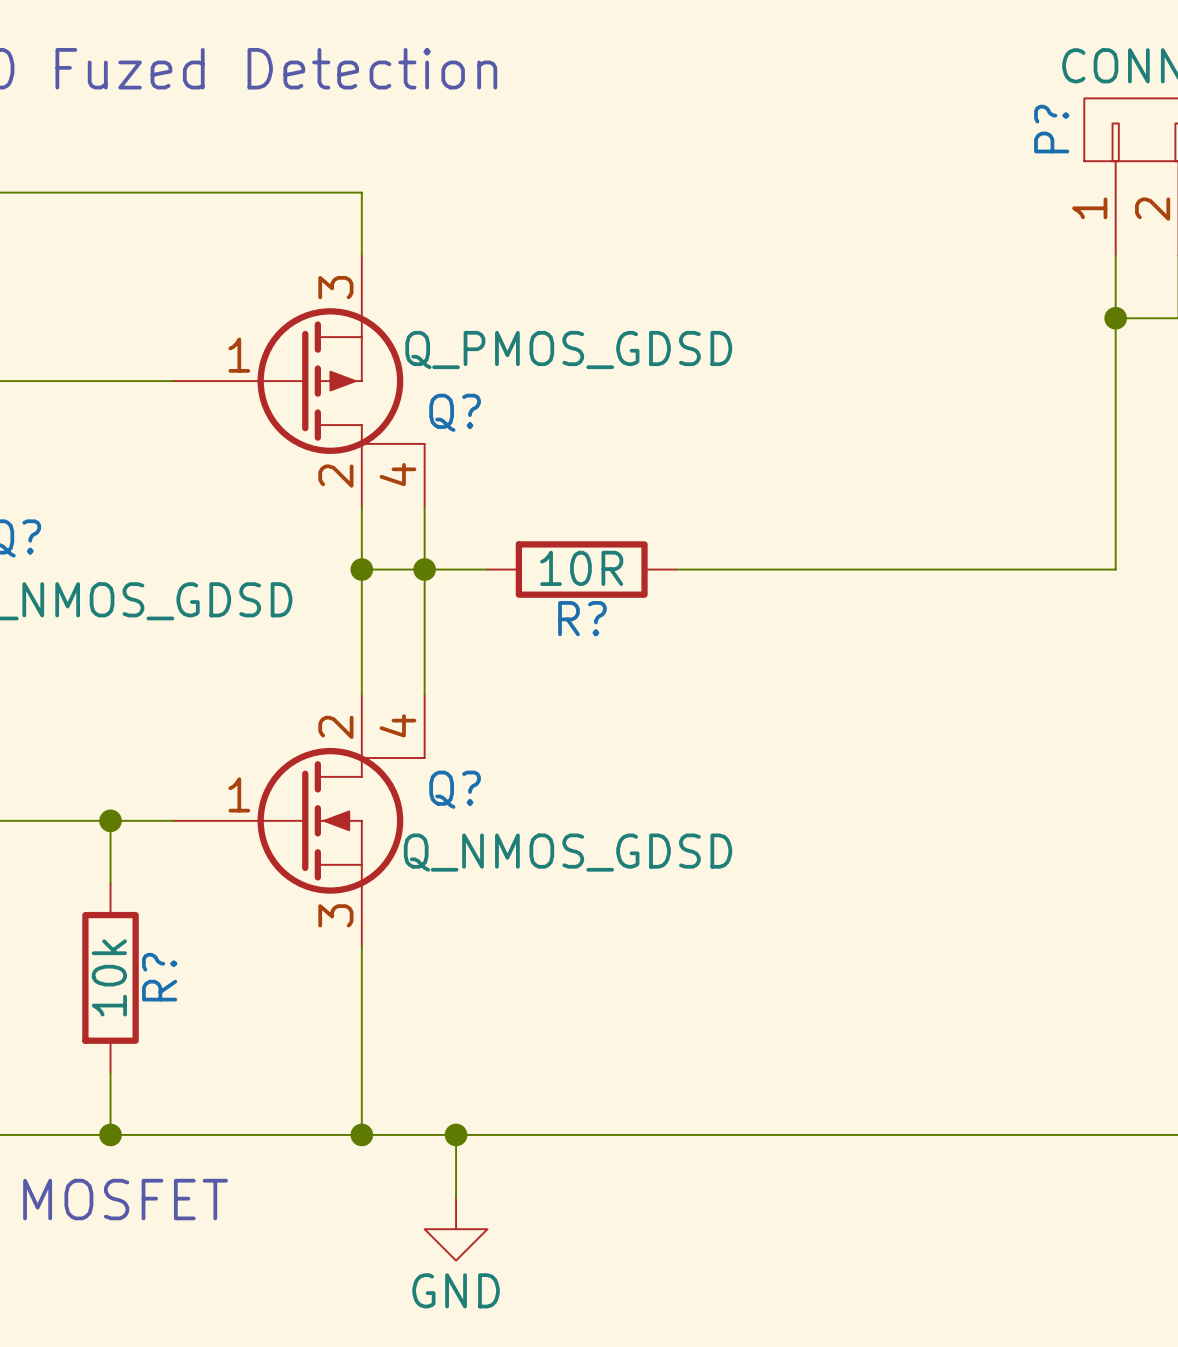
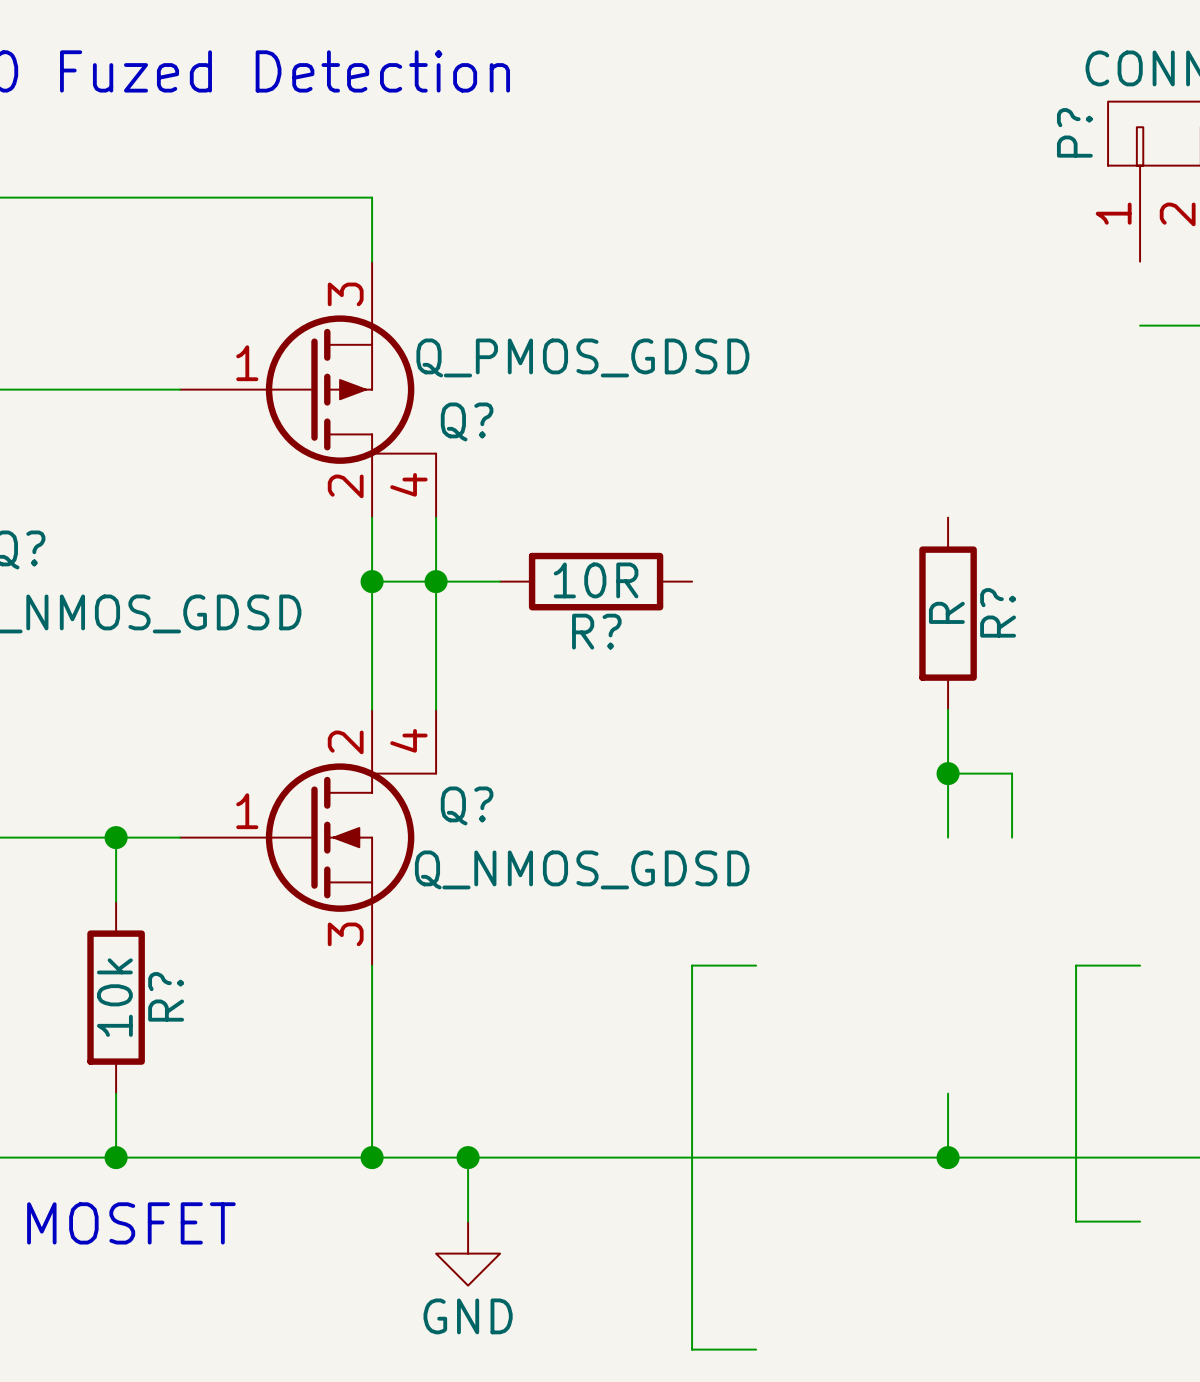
wire: (1115, 255) (1115, 569) (675, 569) -> none
junction: (1115, 318) -> none
R?: none -> R (948, 613)
wire: none -> (948, 709) (948, 837)
wire: none -> (948, 773) (1012, 773) (1012, 837)
junction: none -> (948, 773)
wire: none -> (756, 965) (692, 965) (692, 1349) (756, 1349)
wire: none -> (1140, 965) (1076, 965) (1076, 1221) (1140, 1221)
wire: none -> (948, 1093) (948, 1157)
junction: none -> (948, 1157)

